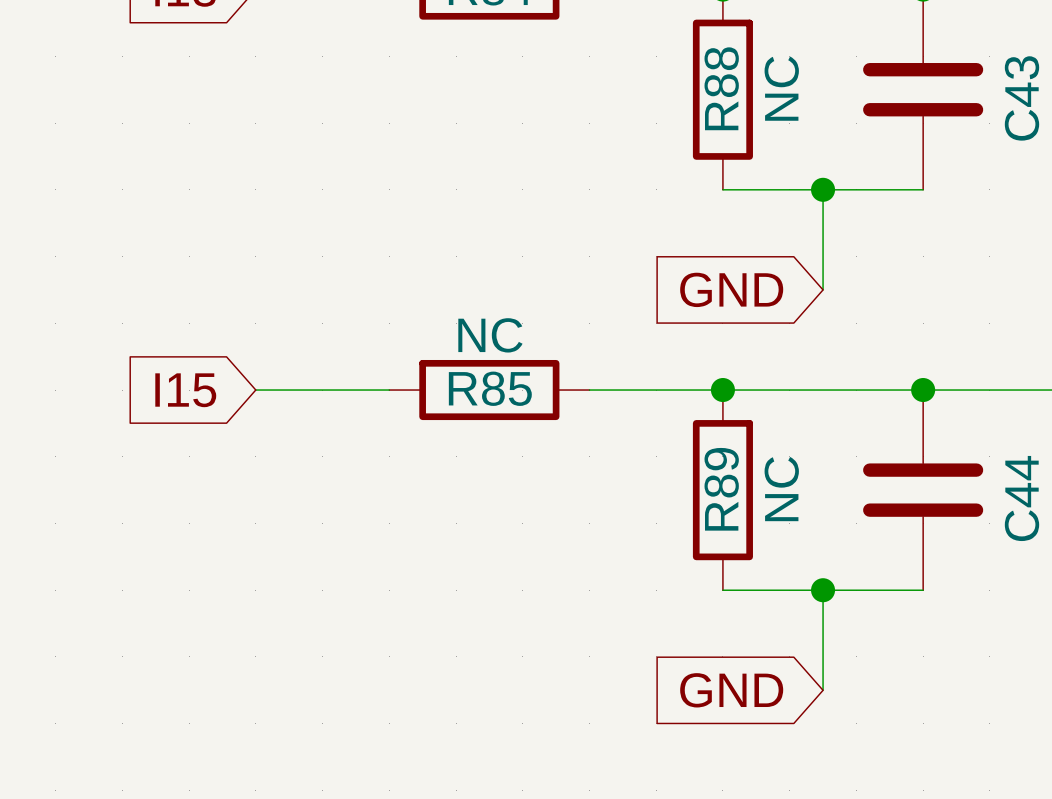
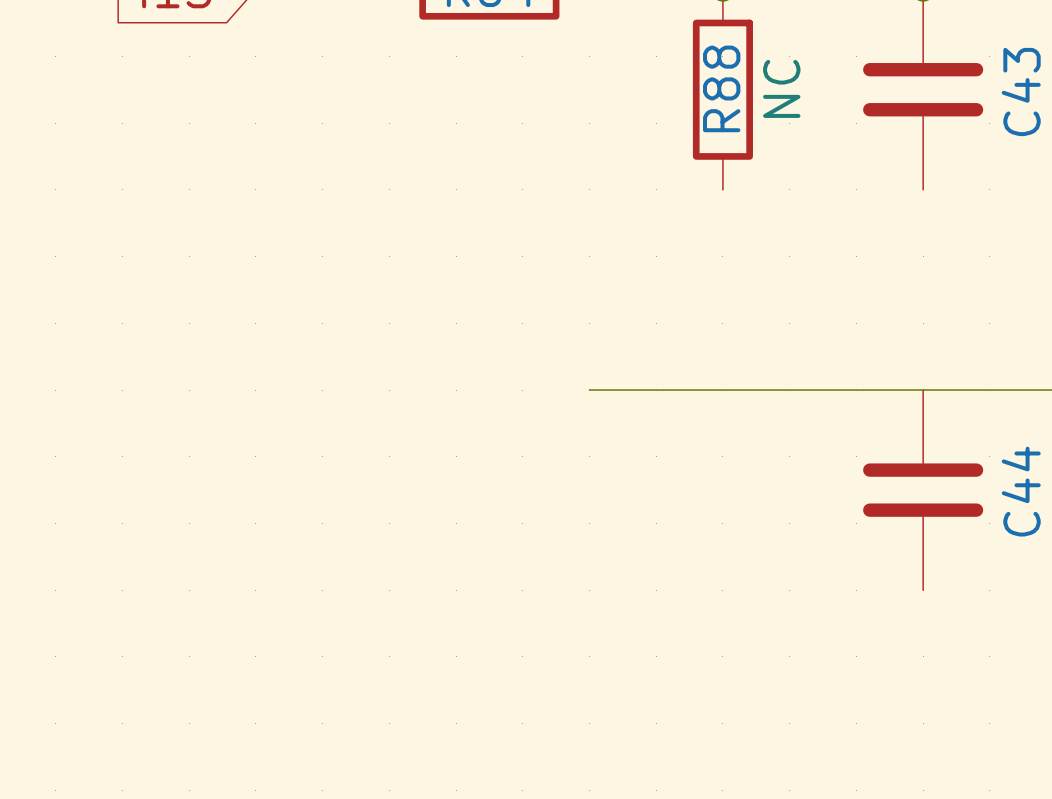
wire: (722, 189) (923, 189) -> none
wire: (823, 189) (823, 289) -> none
junction: (823, 189) -> none
global label: GND (731, 289) -> none
global label: I15 (185, 390) -> none
wire: (255, 390) (389, 390) -> none
R85: NC (489, 390) -> none
junction: (722, 390) -> none
junction: (923, 390) -> none
R89: NC (722, 490) -> none
wire: (722, 590) (923, 590) -> none
wire: (823, 590) (823, 690) -> none
junction: (823, 590) -> none
global label: GND (731, 690) -> none

